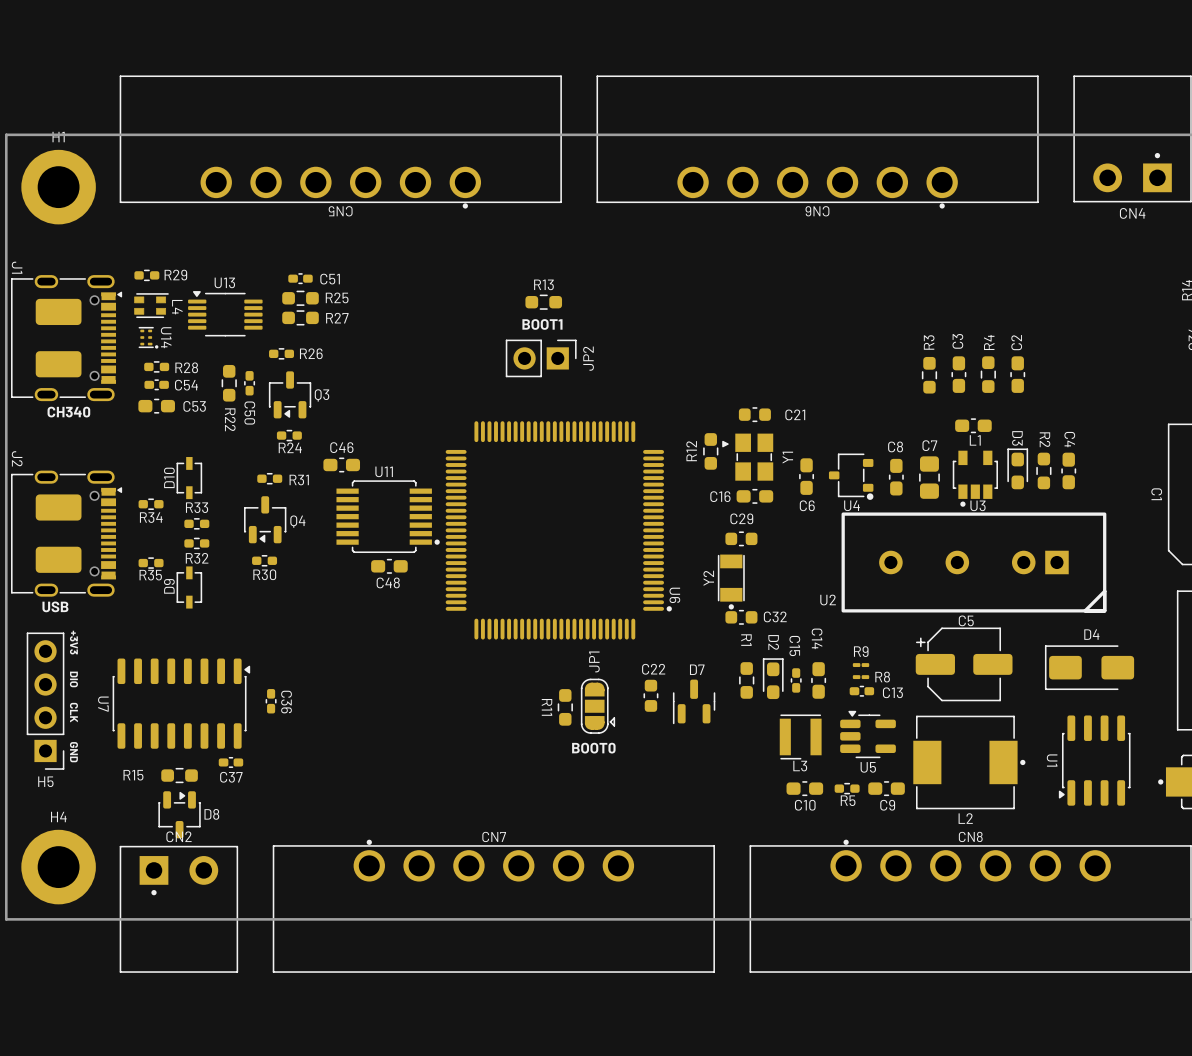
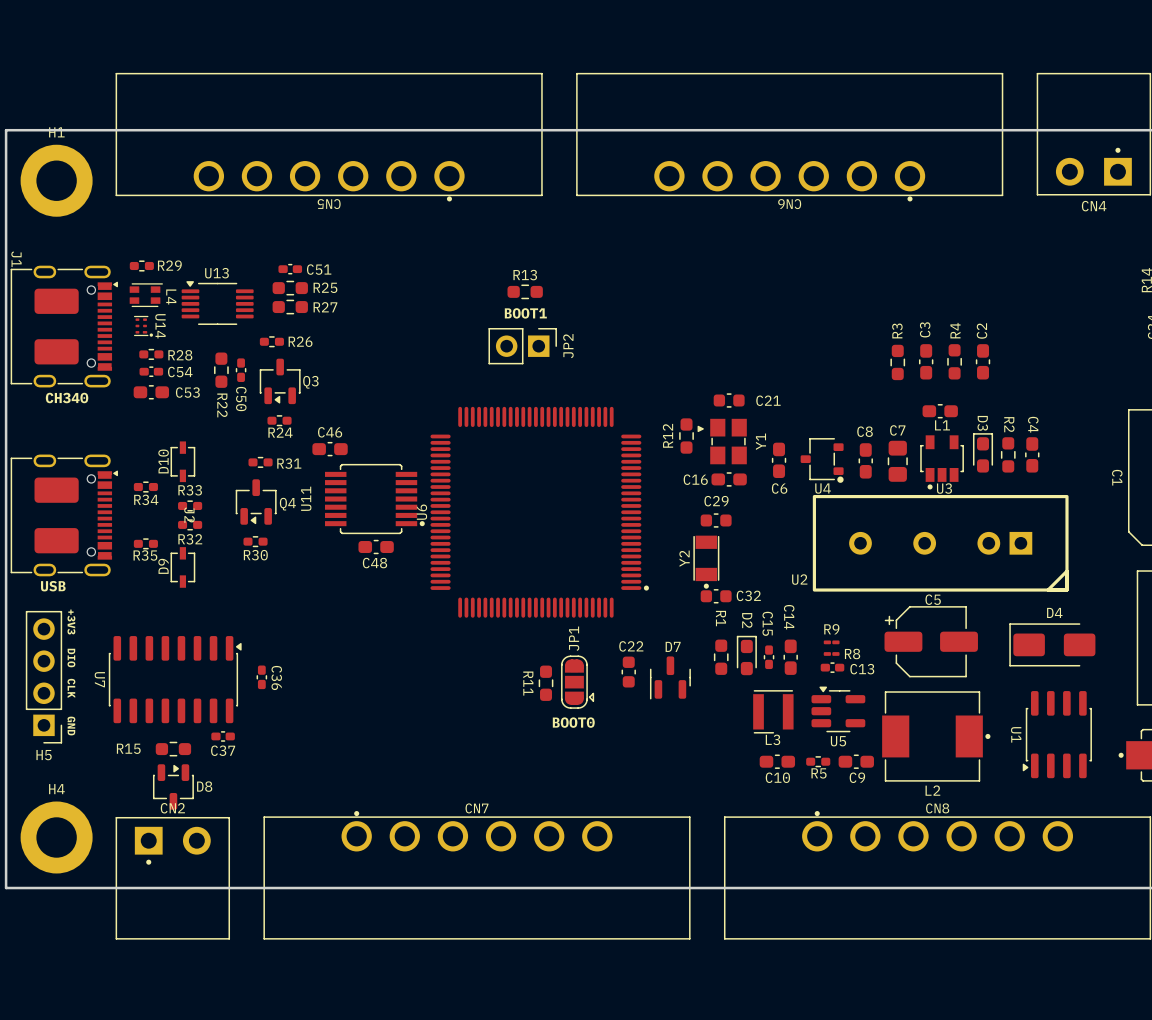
J2 name position: J2 (17, 458) -> J2 (189, 515)
U11 name rotation: 0° (384, 471) -> 90° counterclockwise (306, 498)
U11 name position: U11 (384, 471) -> U11 (306, 498)
U6 name rotation: 0° (674, 595) -> 180° (421, 512)
U6 name position: U6 (674, 595) -> U6 (421, 512)

